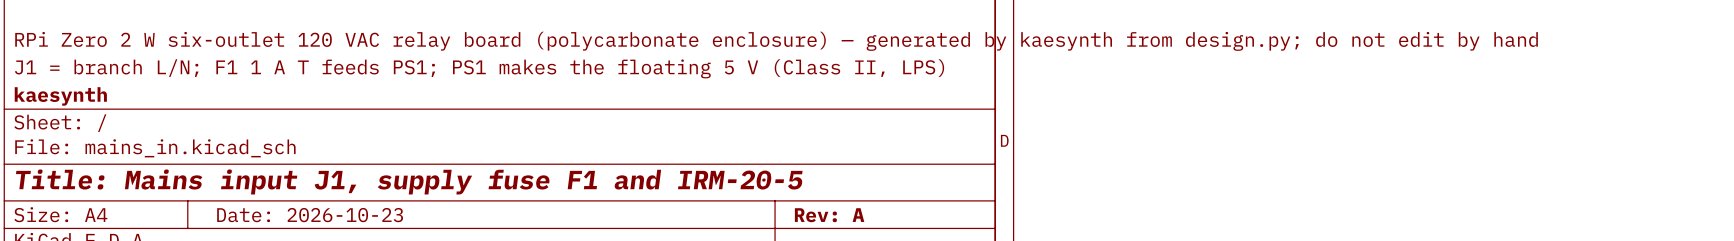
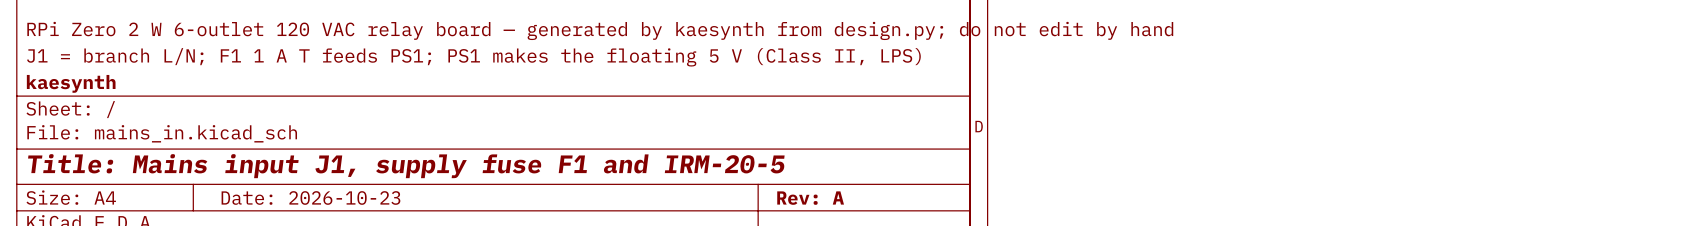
title block: RPi Zero 2 W six-outlet 120 VAC relay board (polycarbonate enclosure) — generated by kaesynth from design.py; do not edit by hand (776, 41) -> RPi Zero 2 W 6-outlet 120 VAC relay board — generated by kaesynth from design.py; do not edit by hand (600, 30)

